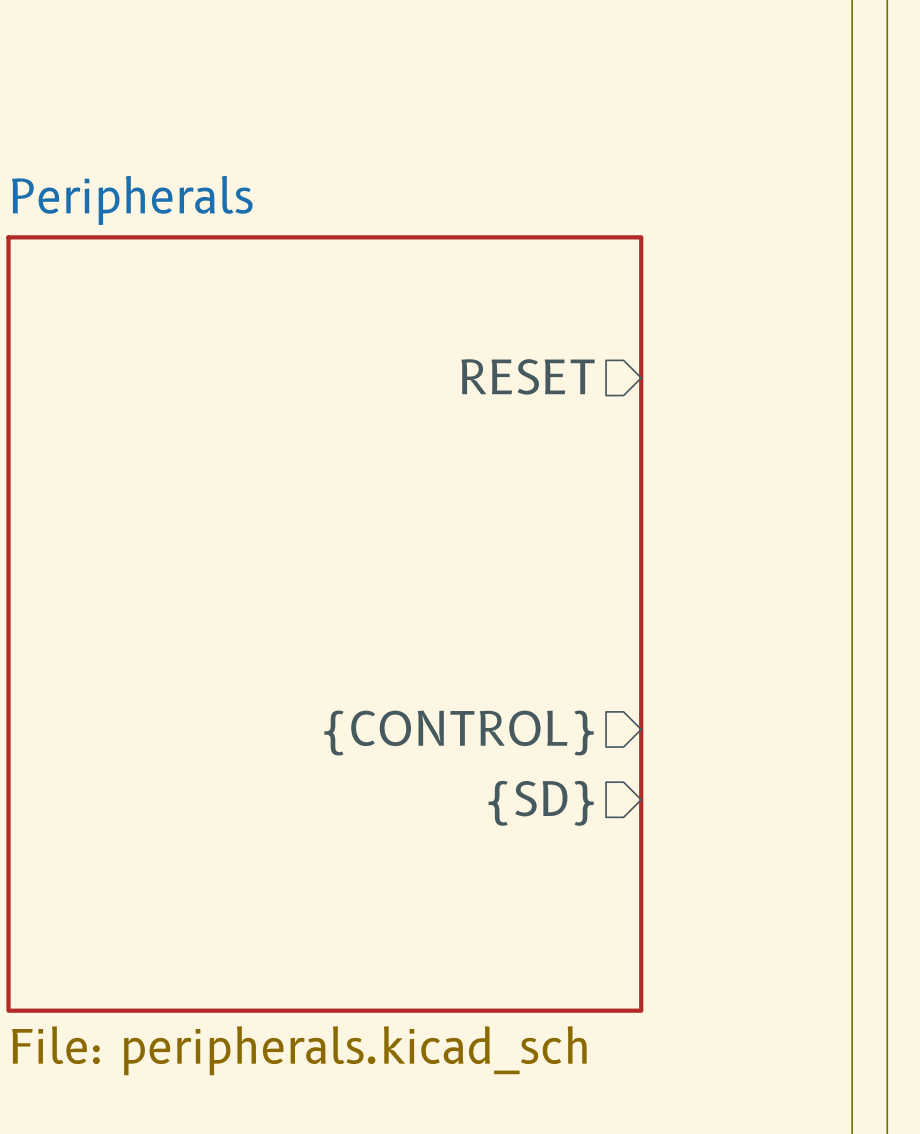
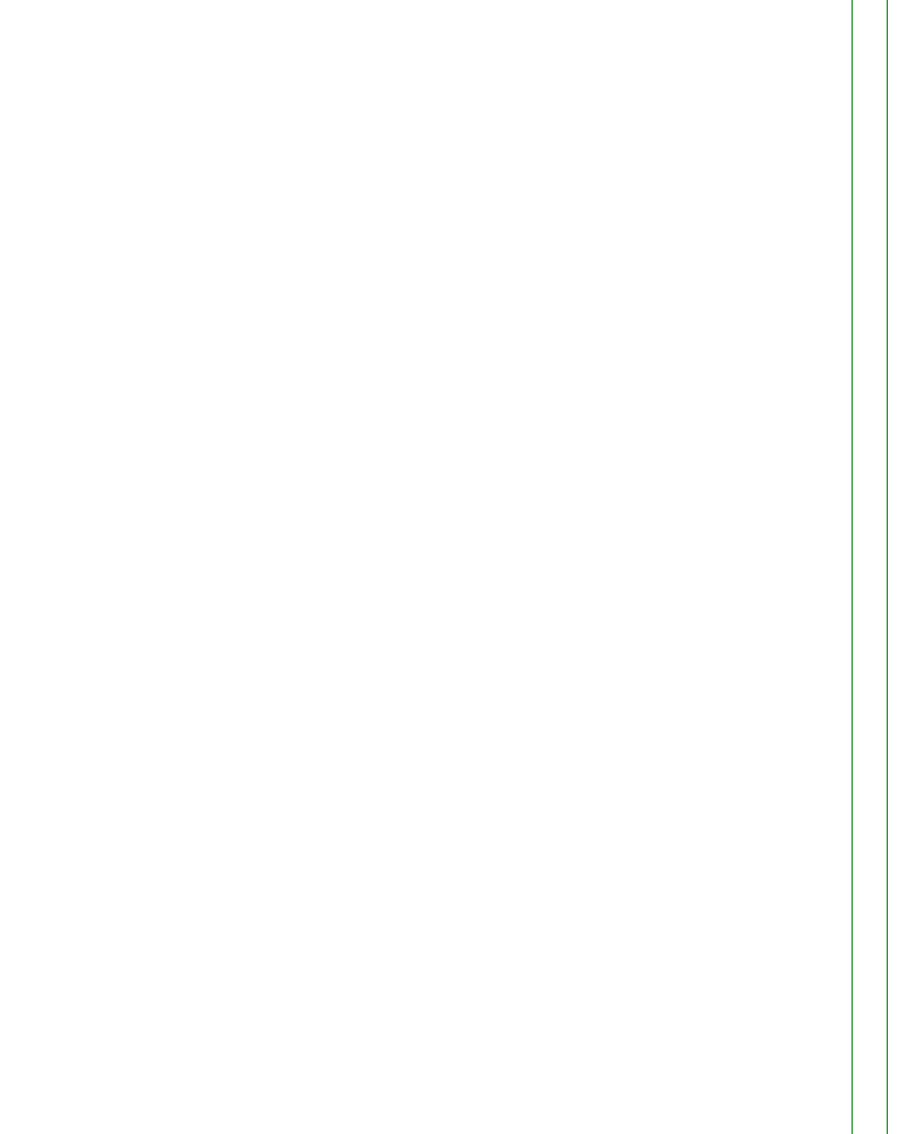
sheet pin: RESET (528, 376) -> none
sheet Peripherals: File: peripherals.kicad_sch (324, 624) -> none
sheet pin: {CONTROL} (459, 733) -> none
sheet pin: {SD} (541, 803) -> none

